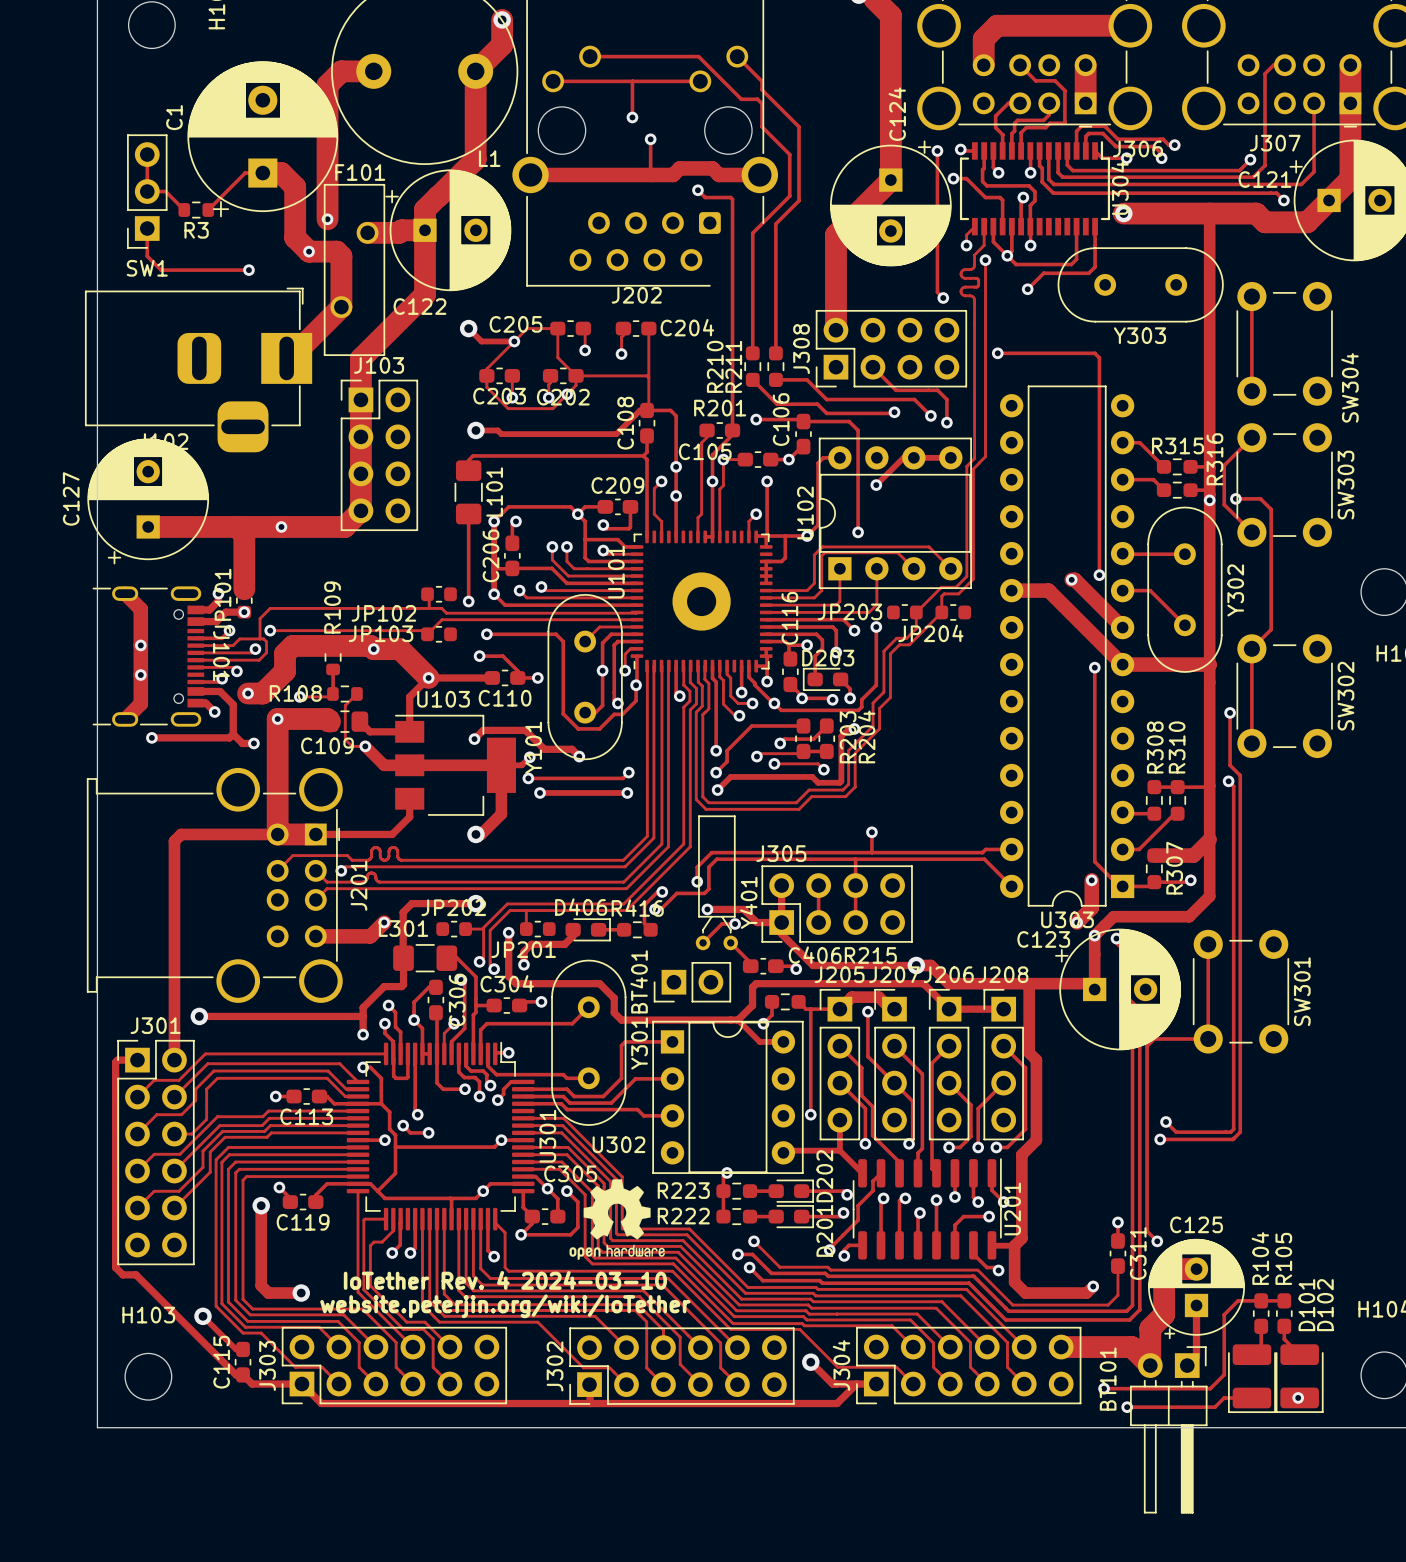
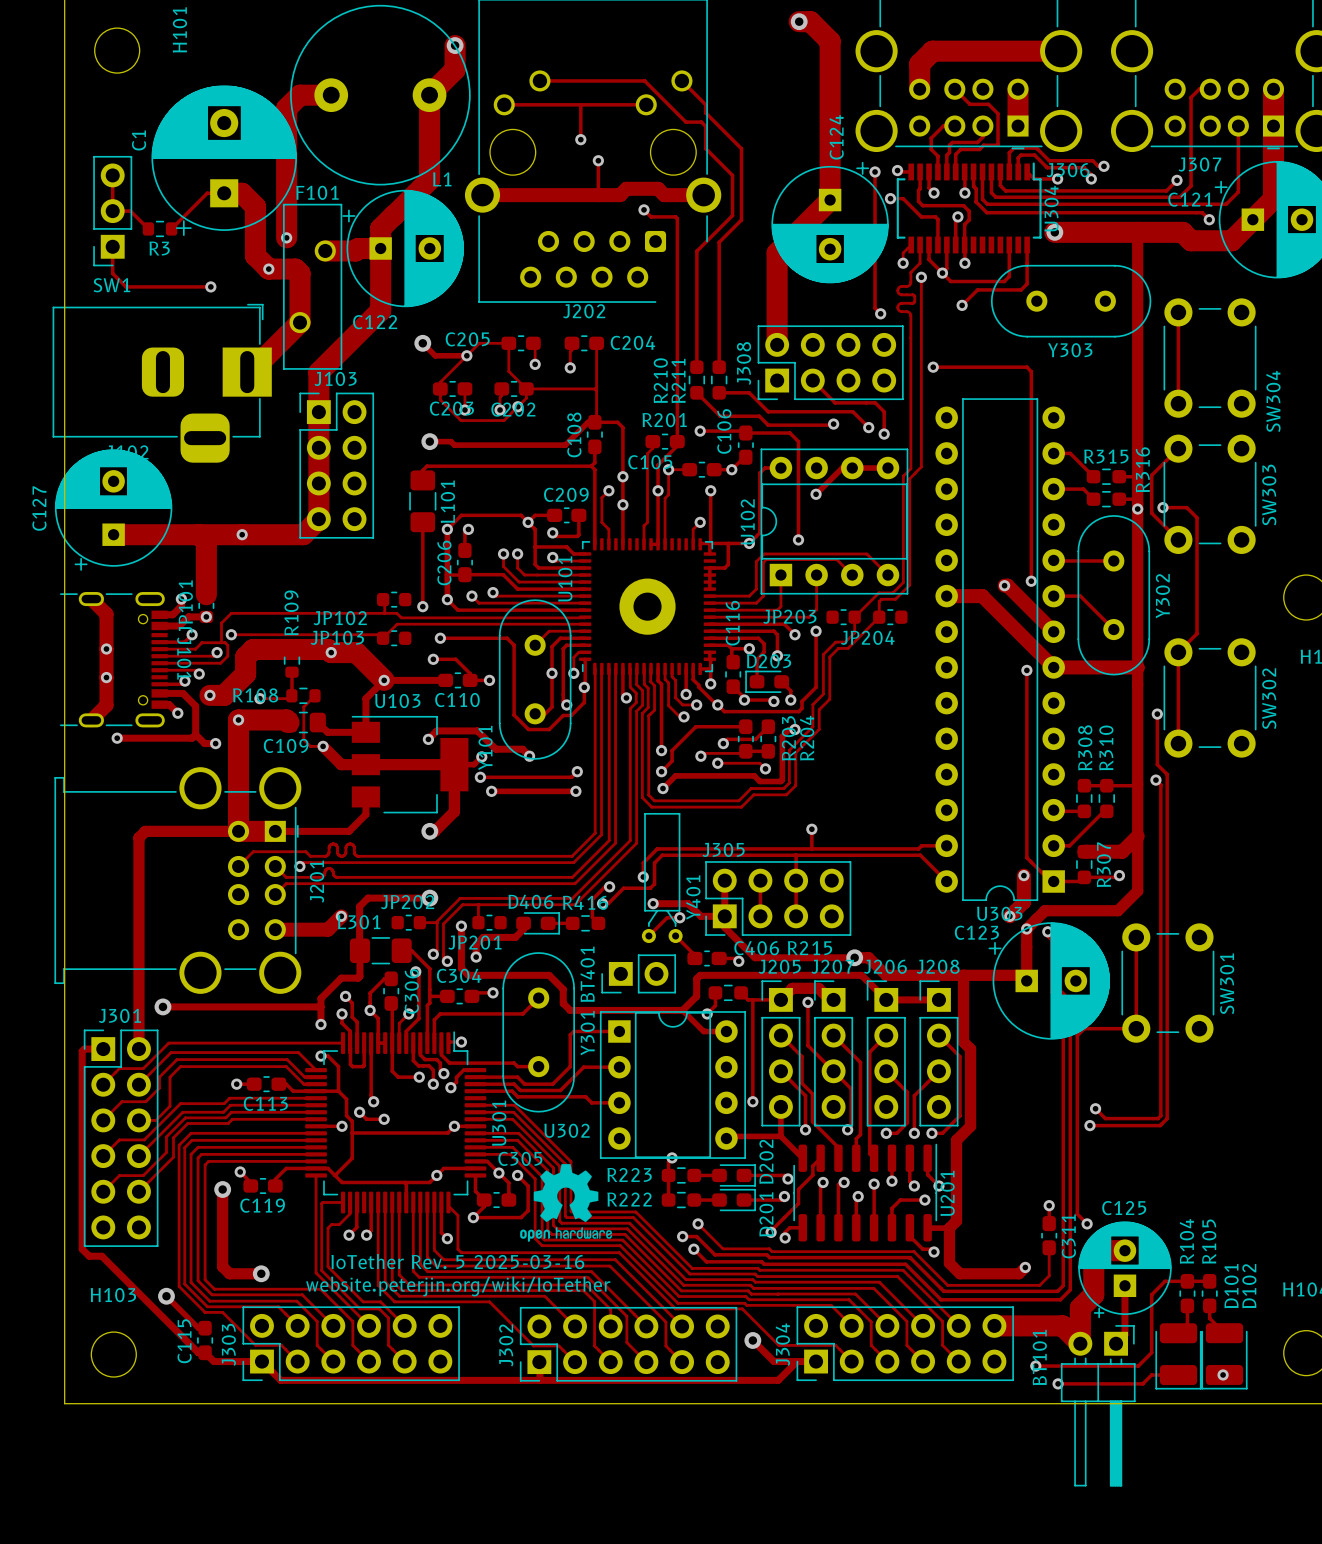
text: IoTether Rev. 4 2024-03-10 (505, 1280) -> IoTether Rev. 5 2025-03-16 (457, 1261)

